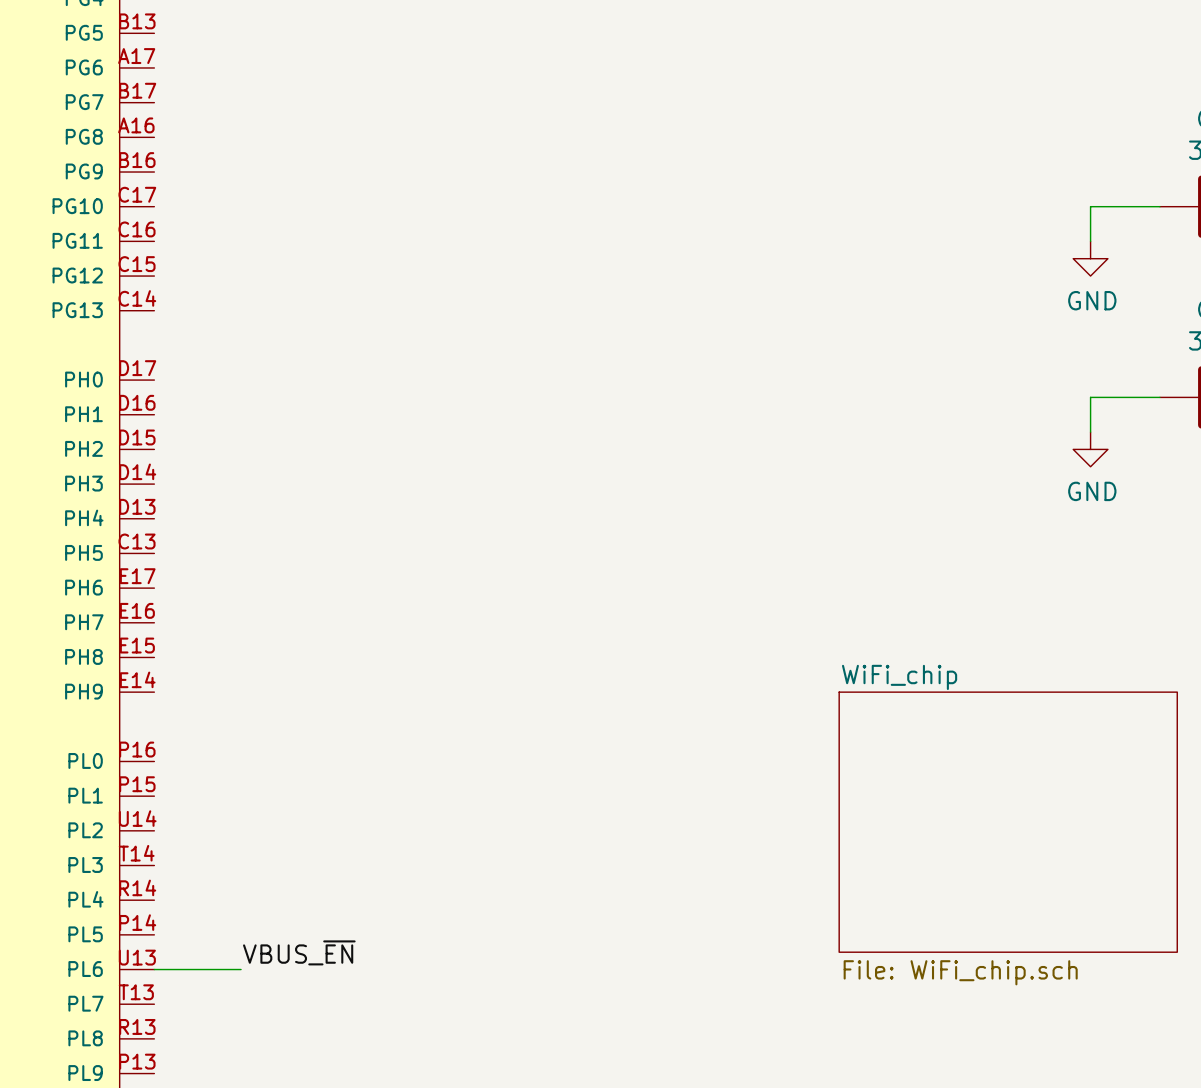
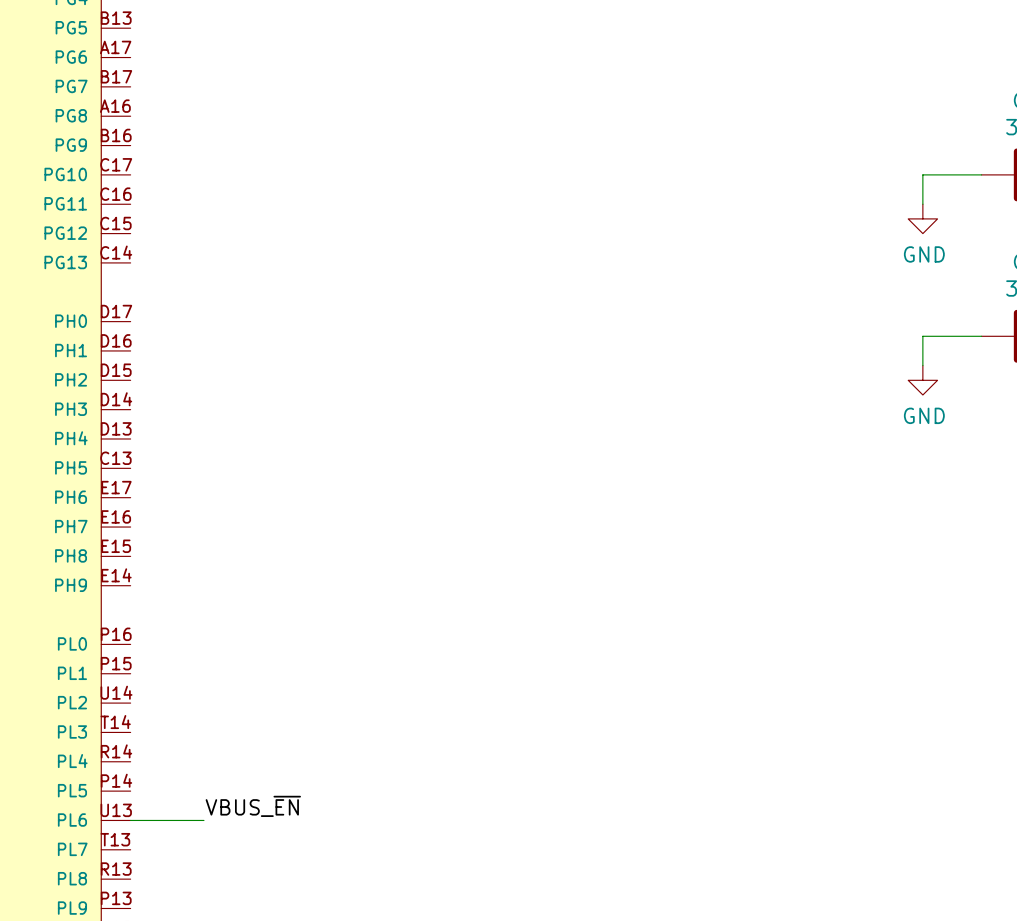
sheet WiFi_chip: File: WiFi_chip.sch (1008, 822) -> none

